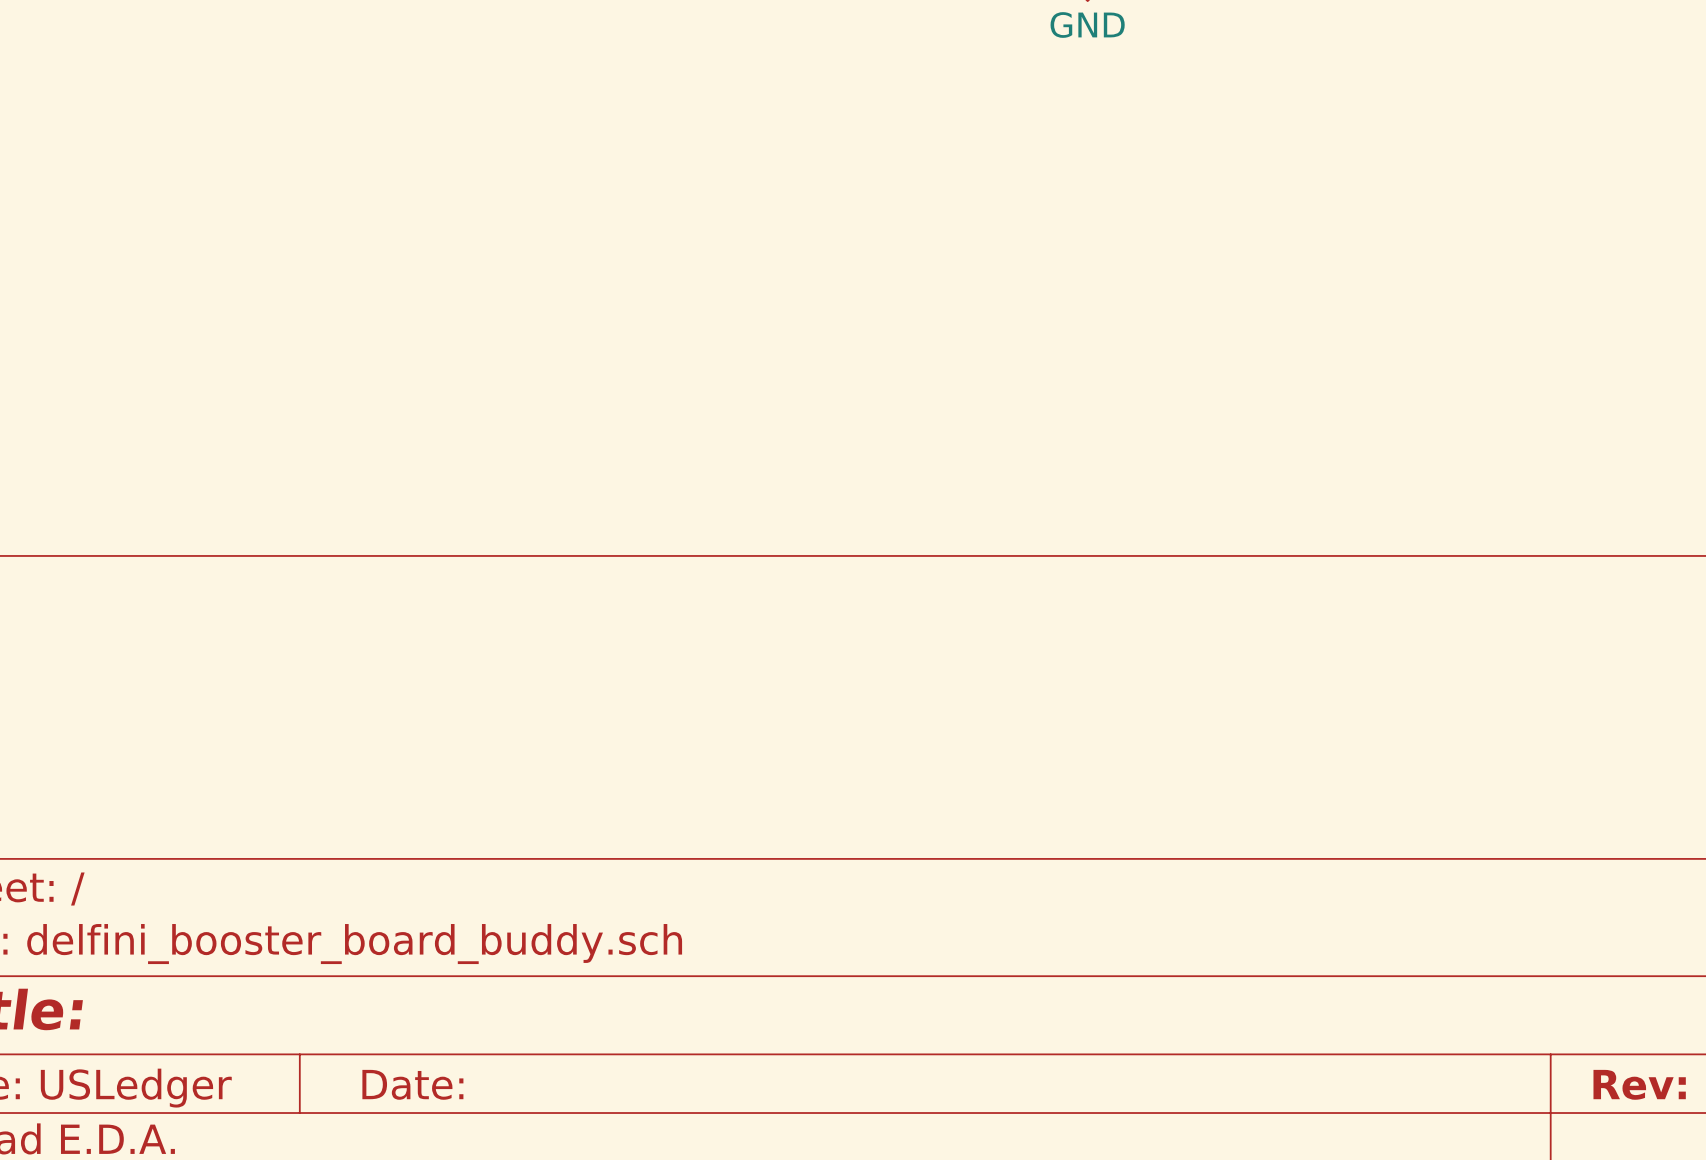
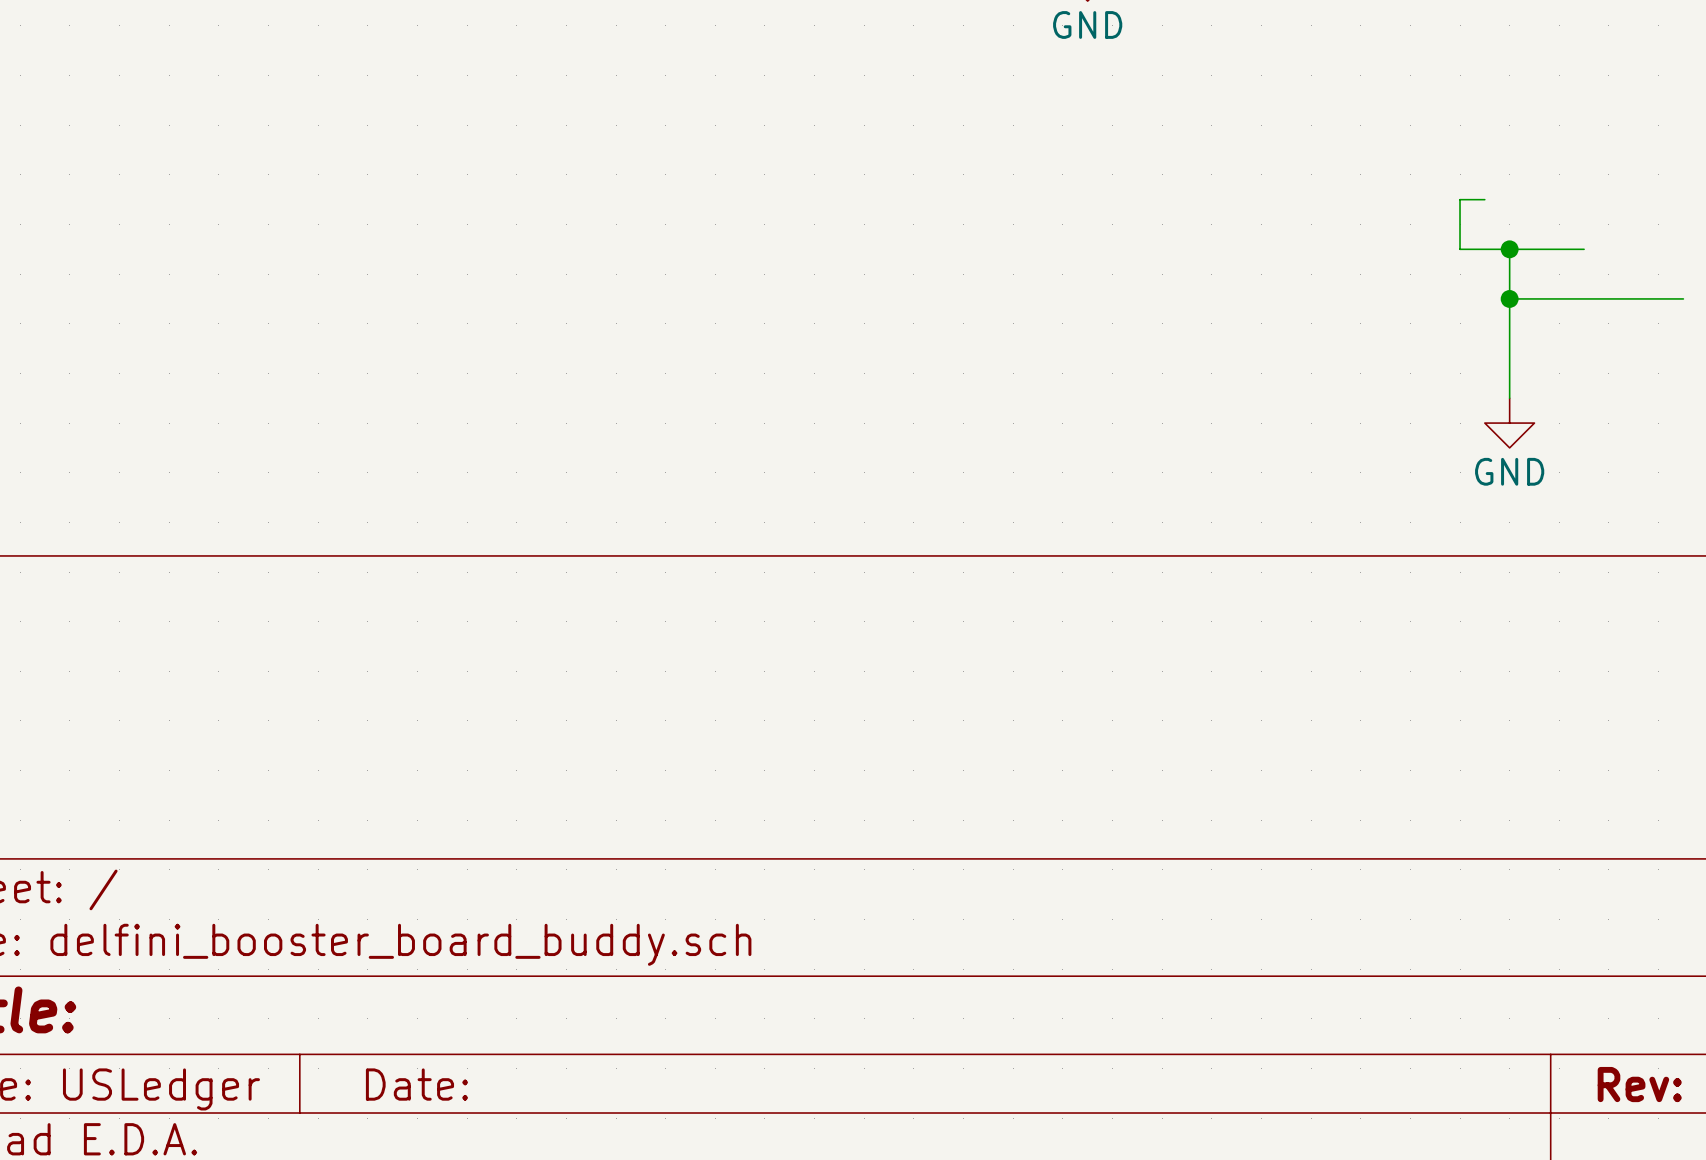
wire: none -> (1484, 199) (1460, 199) (1460, 249) (1584, 249)
wire: none -> (1509, 249) (1509, 398)
junction: none -> (1509, 249)
wire: none -> (1509, 298) (1683, 298)
junction: none -> (1509, 298)
power symbol: none -> GND (1509, 423)

